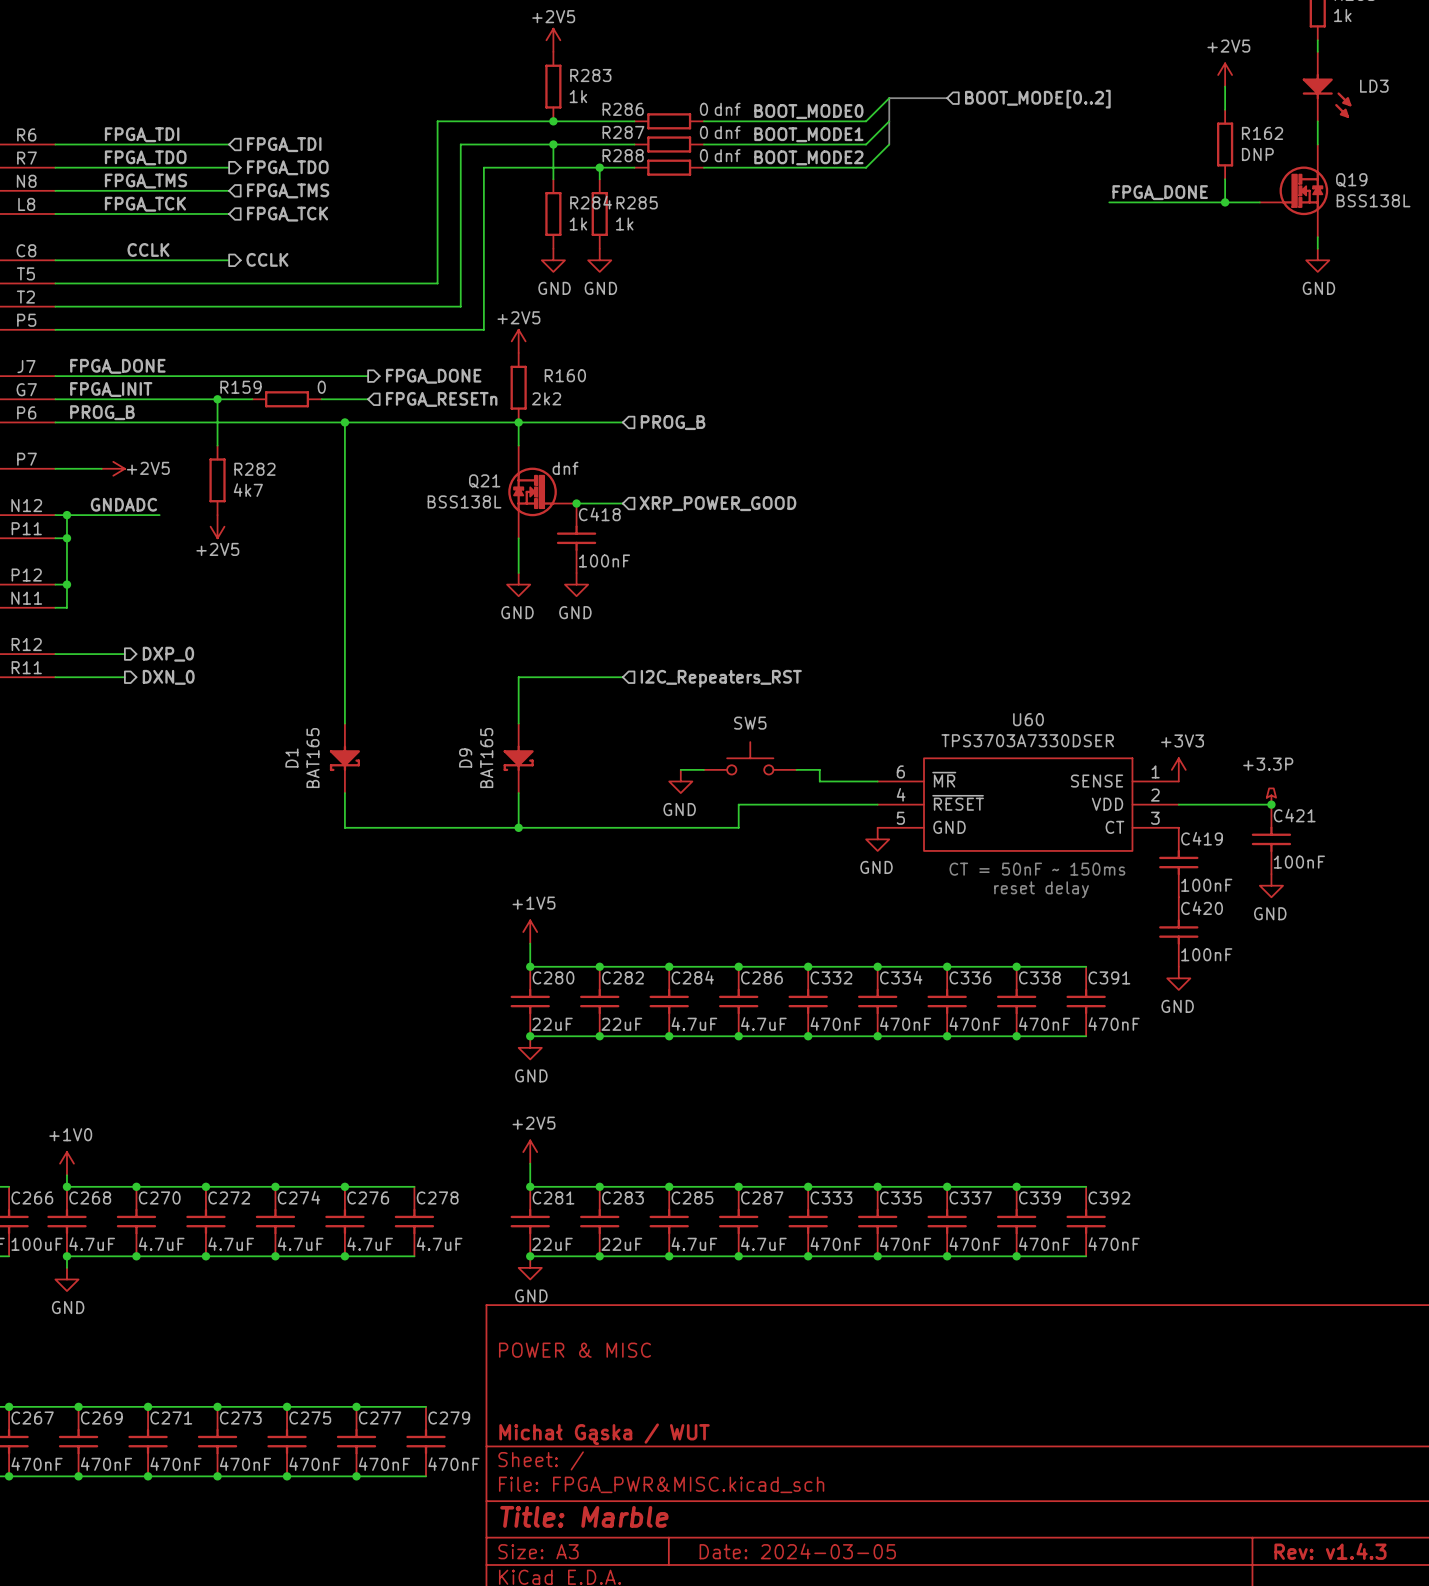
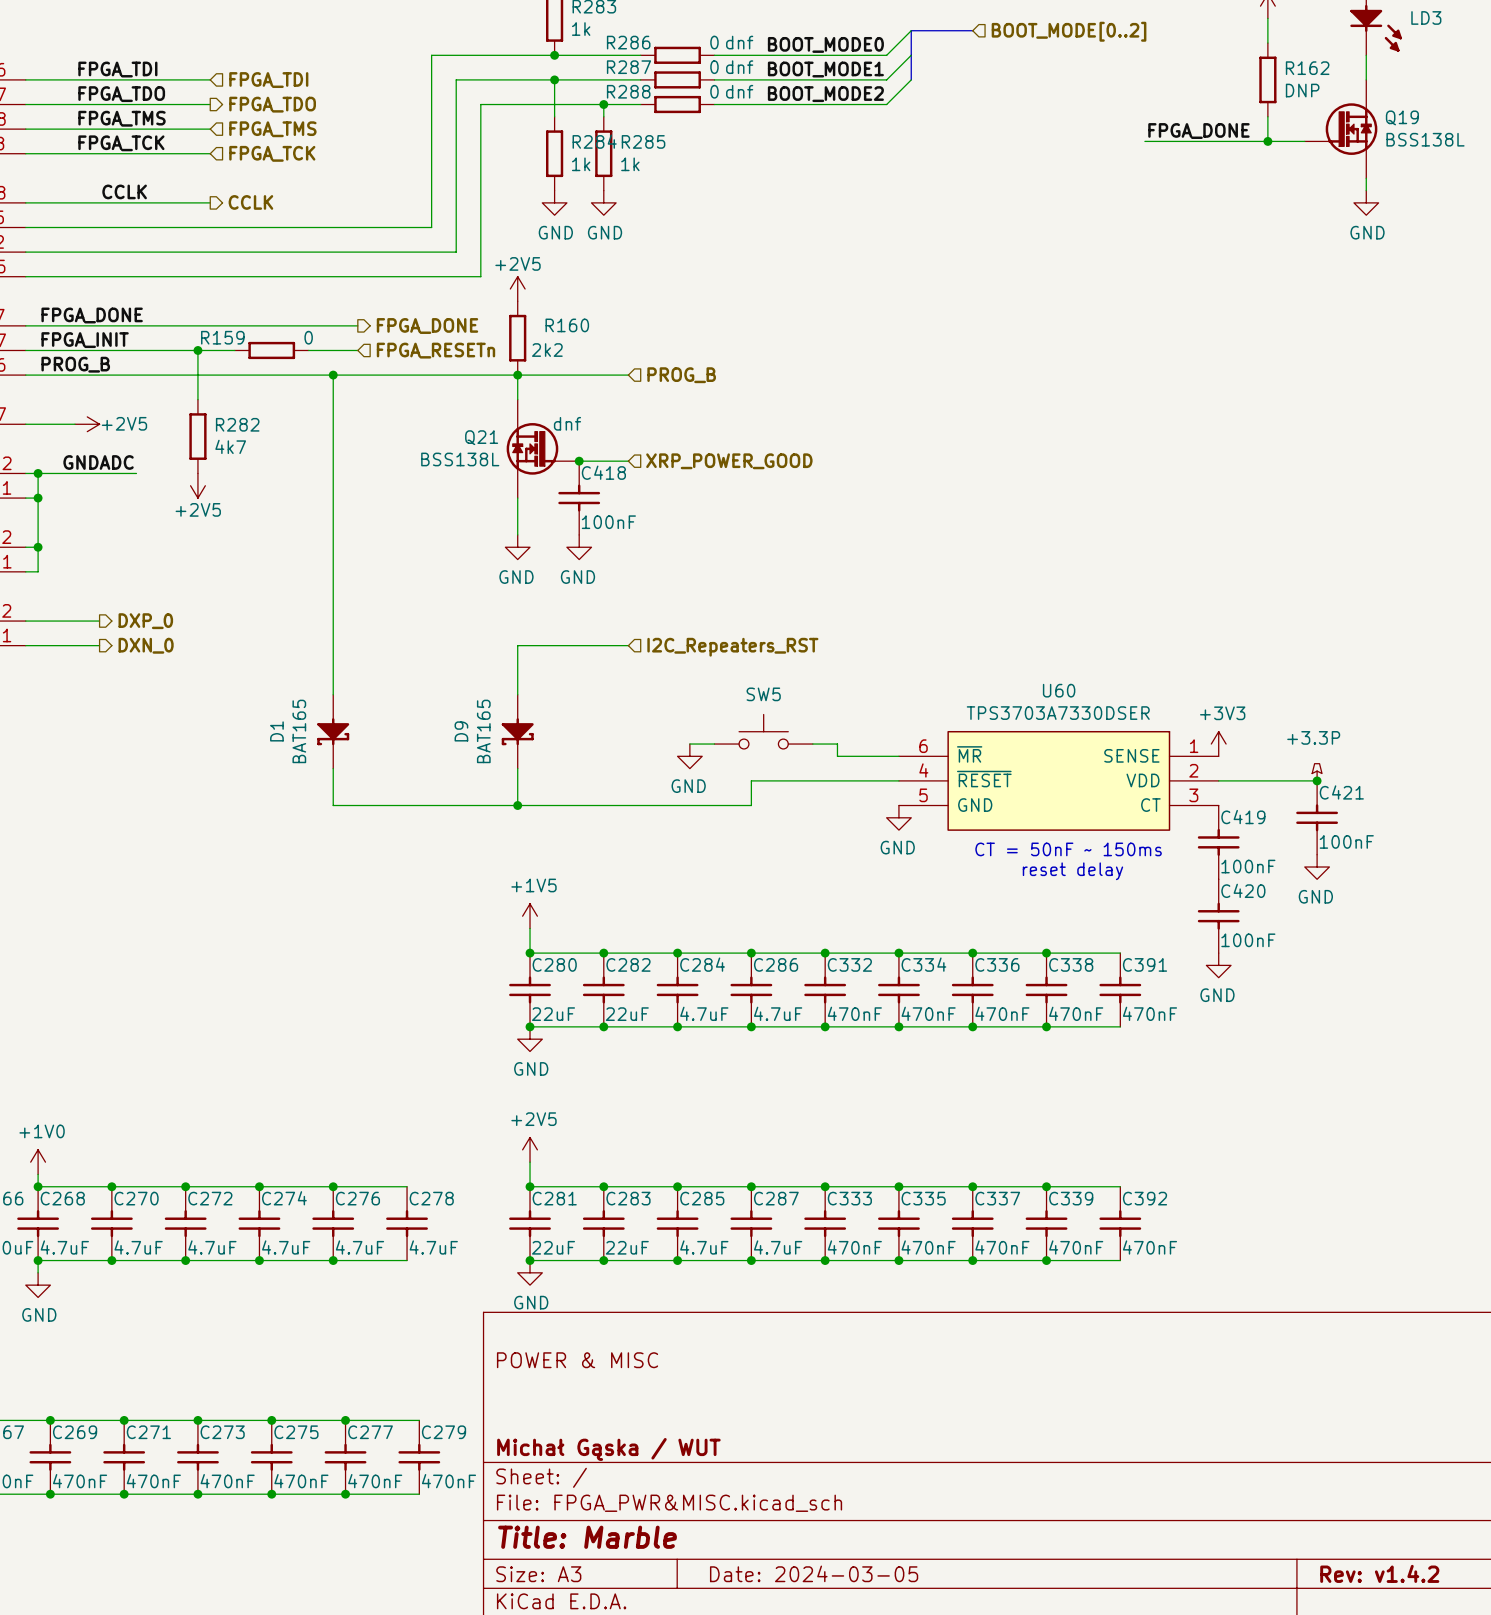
title block: Rev: v1.4.3 (1330, 1551) -> Rev: v1.4.2 (1379, 1573)

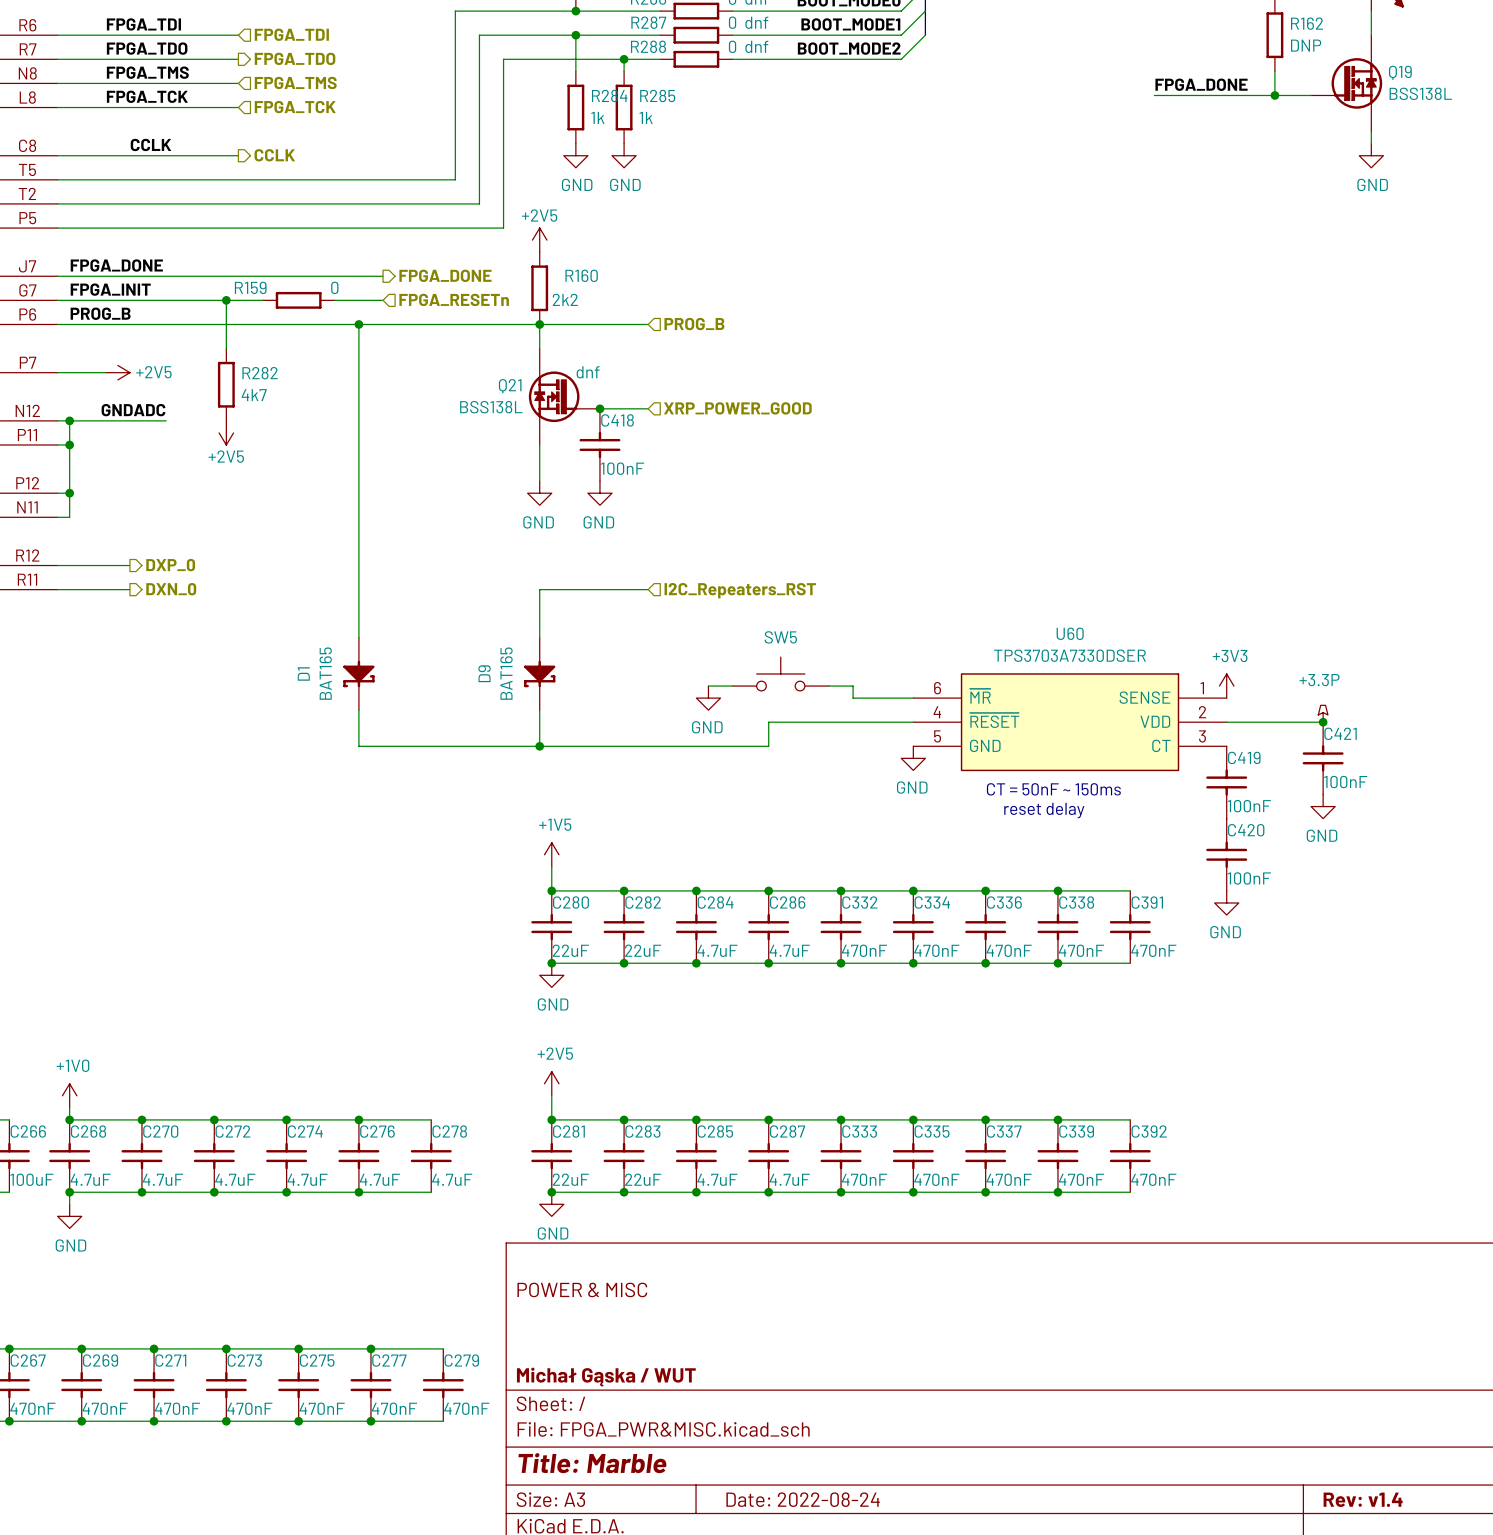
title block: Date: 2024-03-05 (814, 1573) -> Date: 2022-08-24 (803, 1499)
title block: Rev: v1.4.2 (1379, 1573) -> Rev: v1.4 (1363, 1499)

